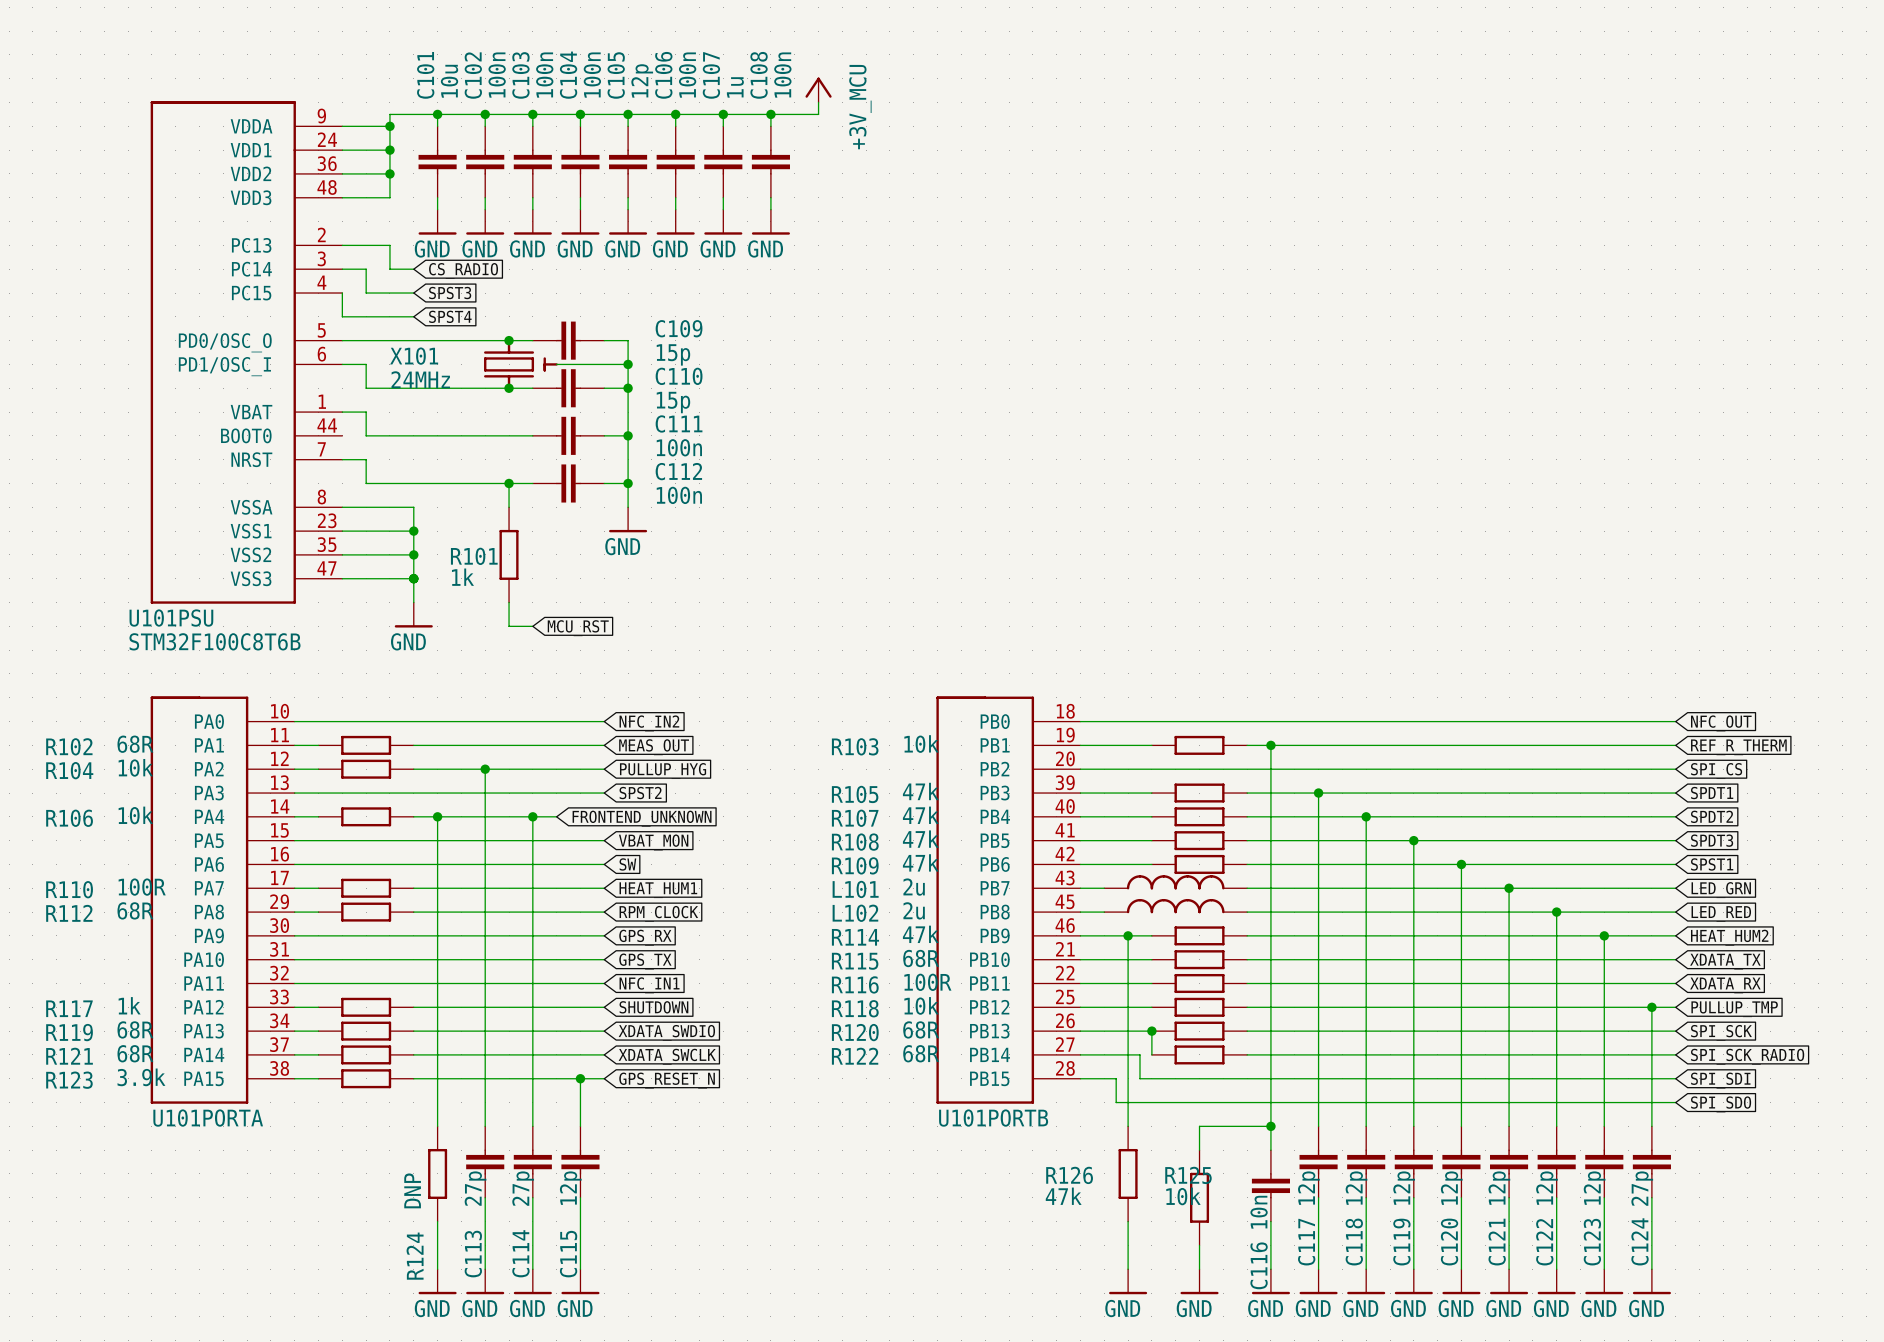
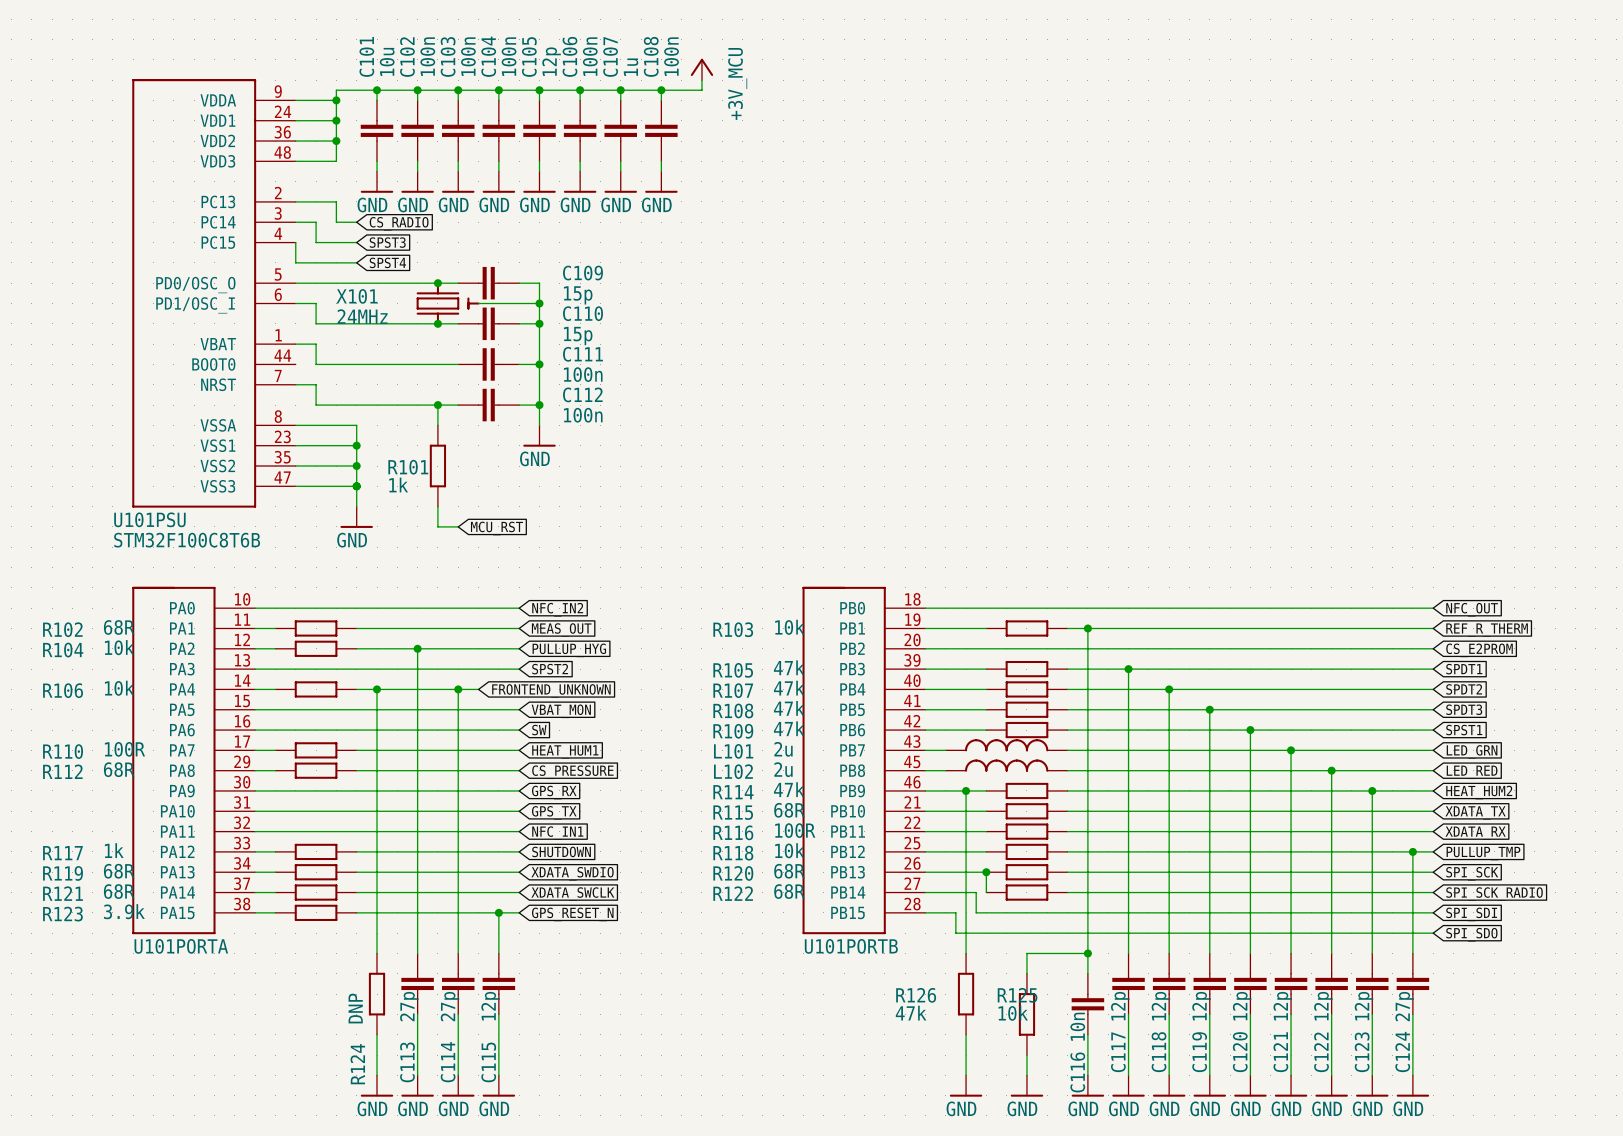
global label: SPI_CS (1716, 771) -> CS_E2PROM (1479, 650)
global label: RPM_CLOCK (658, 913) -> CS_PRESSURE (572, 772)

